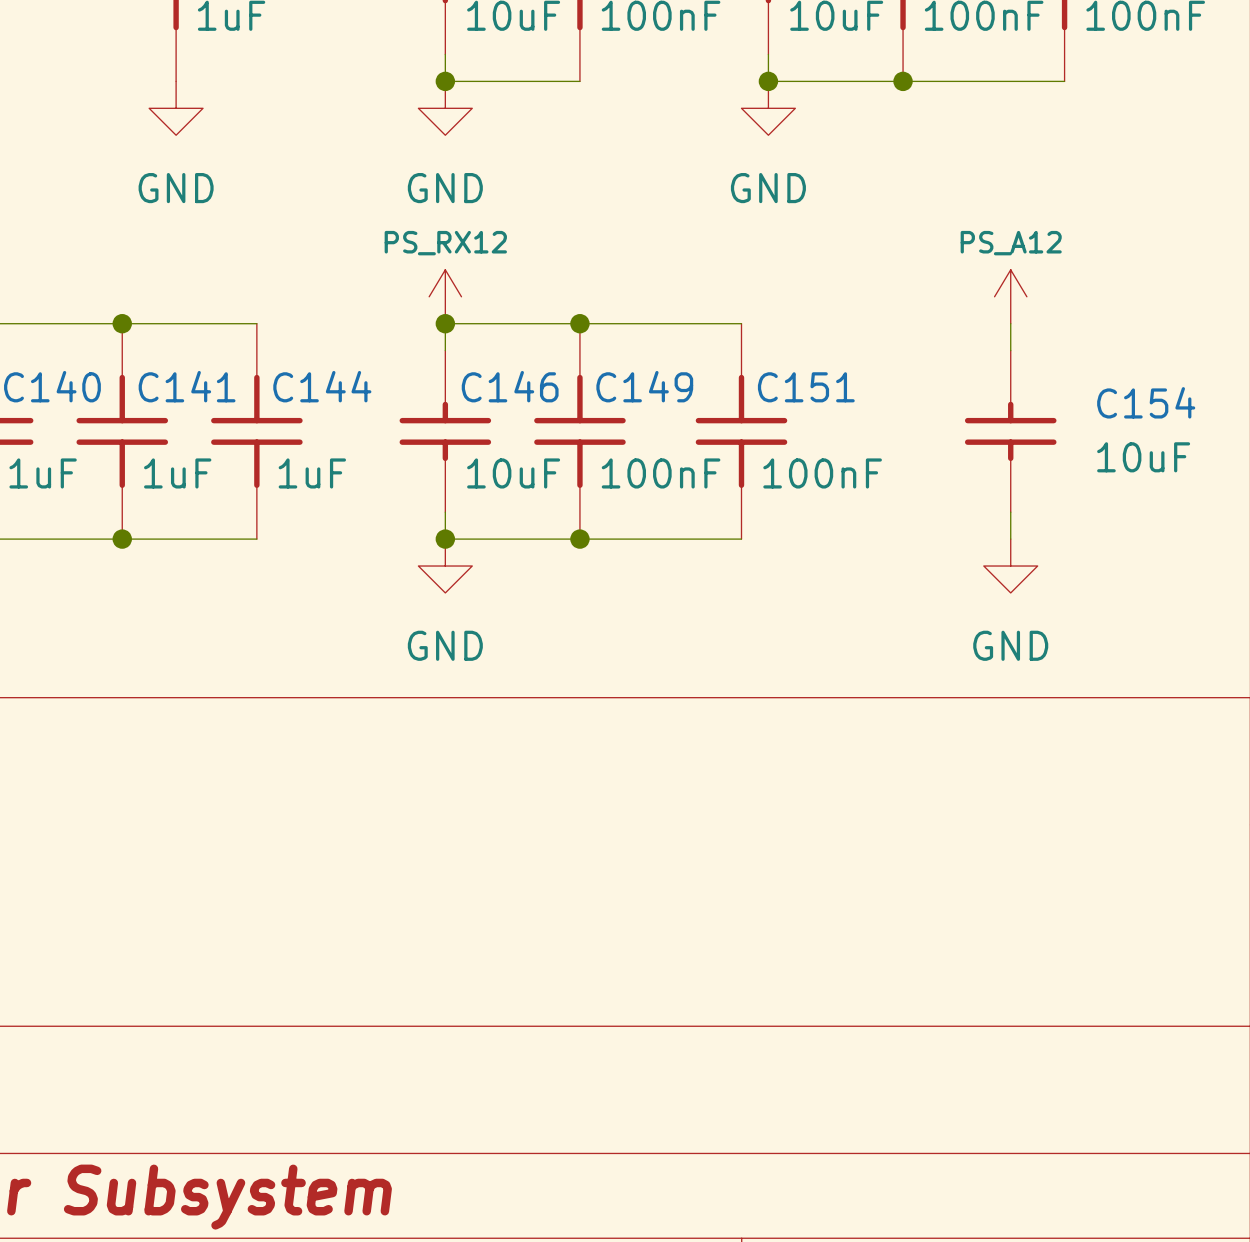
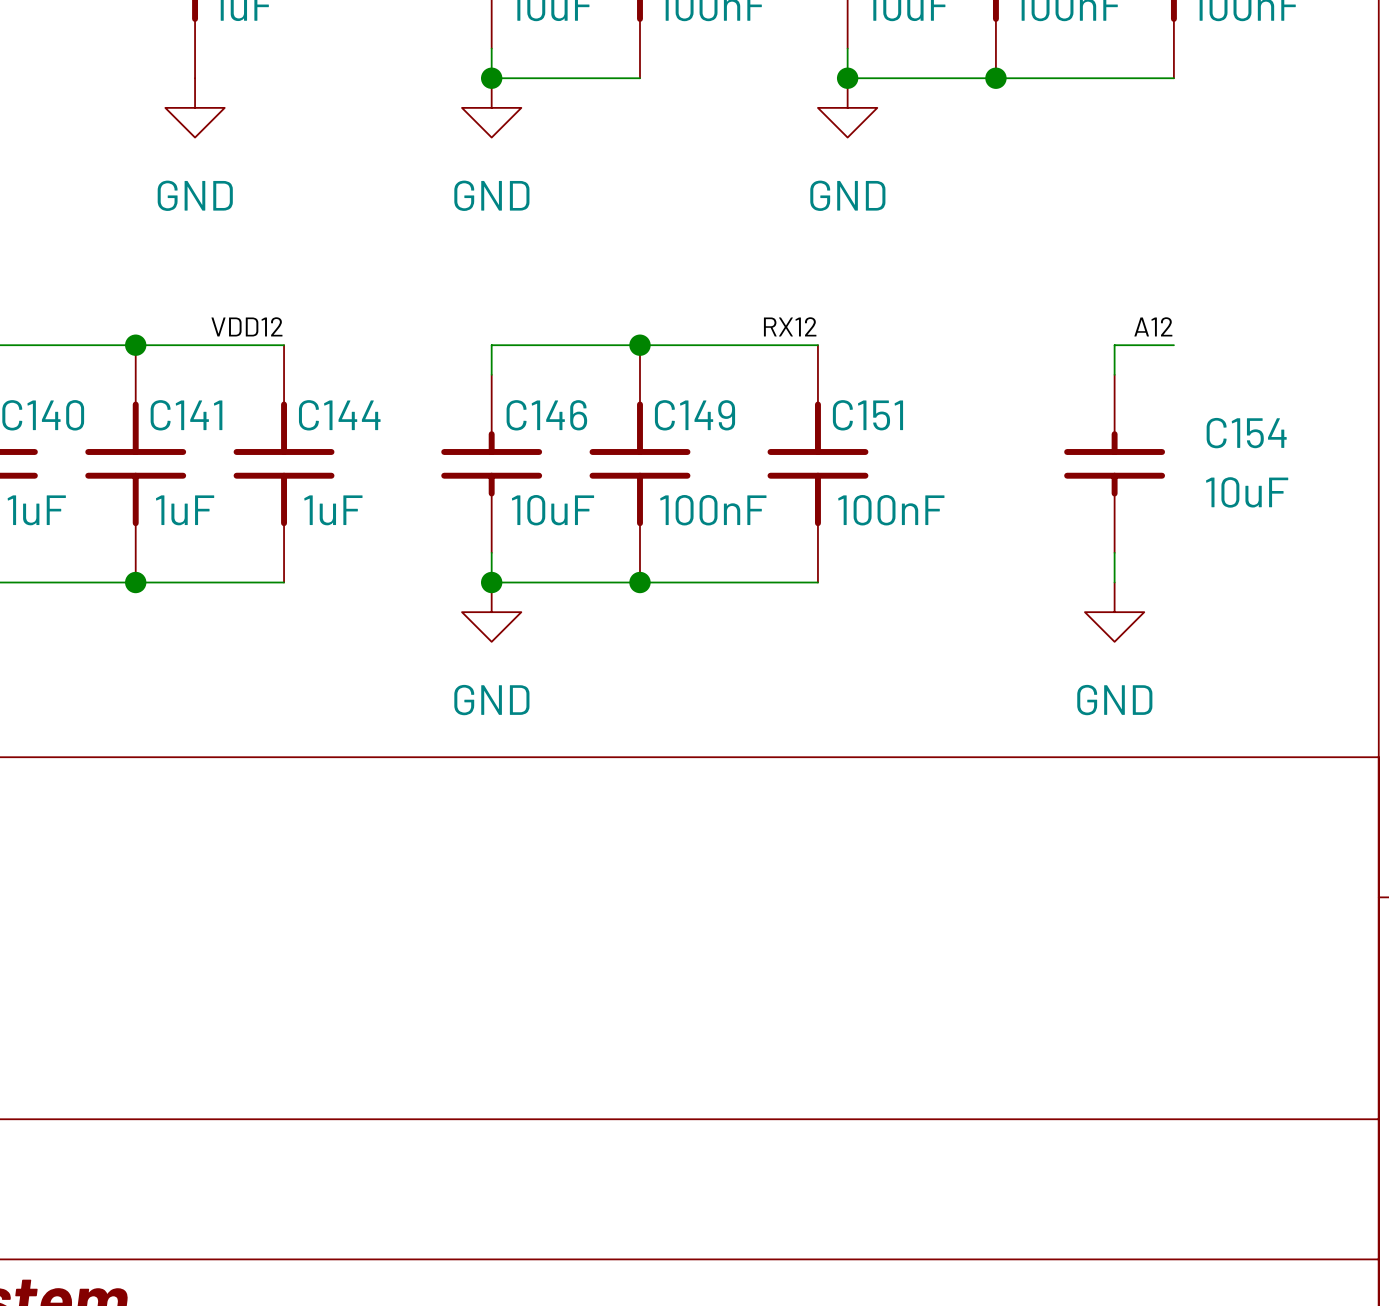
power symbol: PS_RX12 (445, 296) -> none
power symbol: PS_A12 (1010, 296) -> none
label: none -> VDD12 (246, 326)
label: none -> RX12 (790, 326)
label: none -> A12 (1153, 326)
junction: (445, 323) -> none
wire: none -> (1114, 345) (1173, 345)

